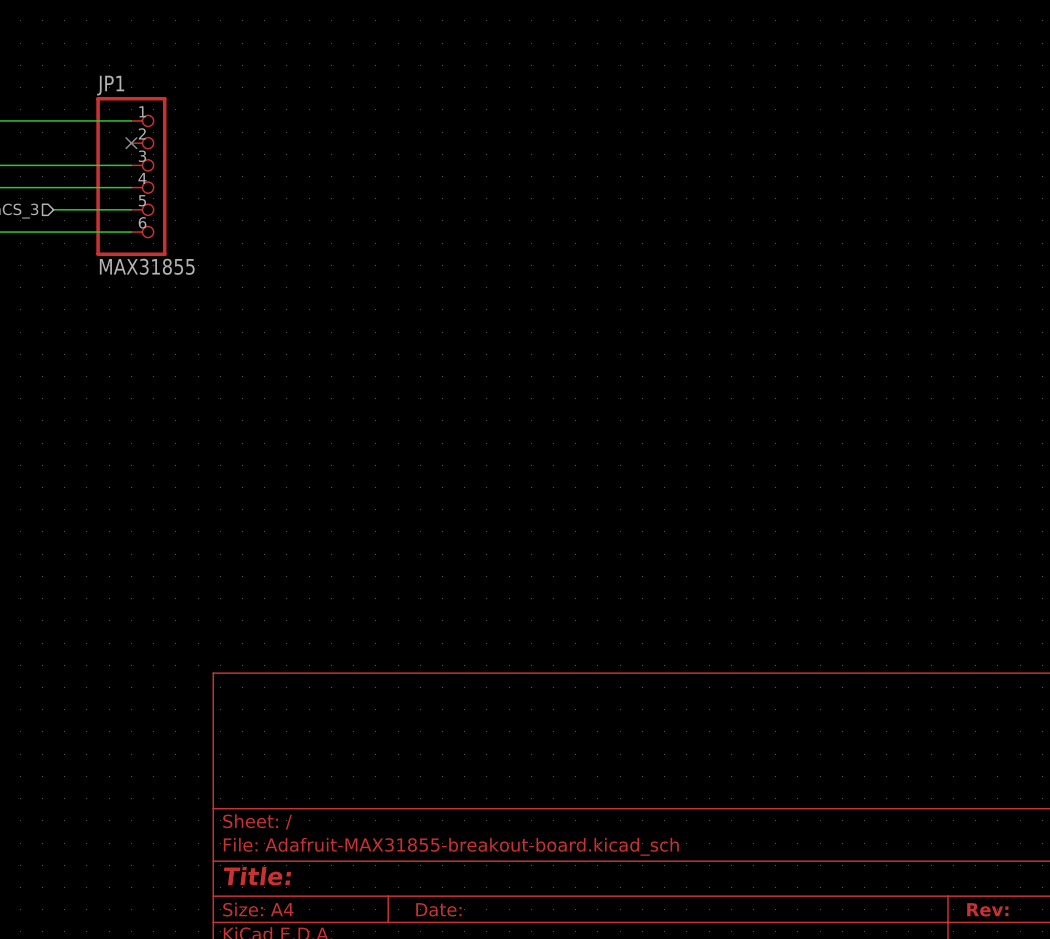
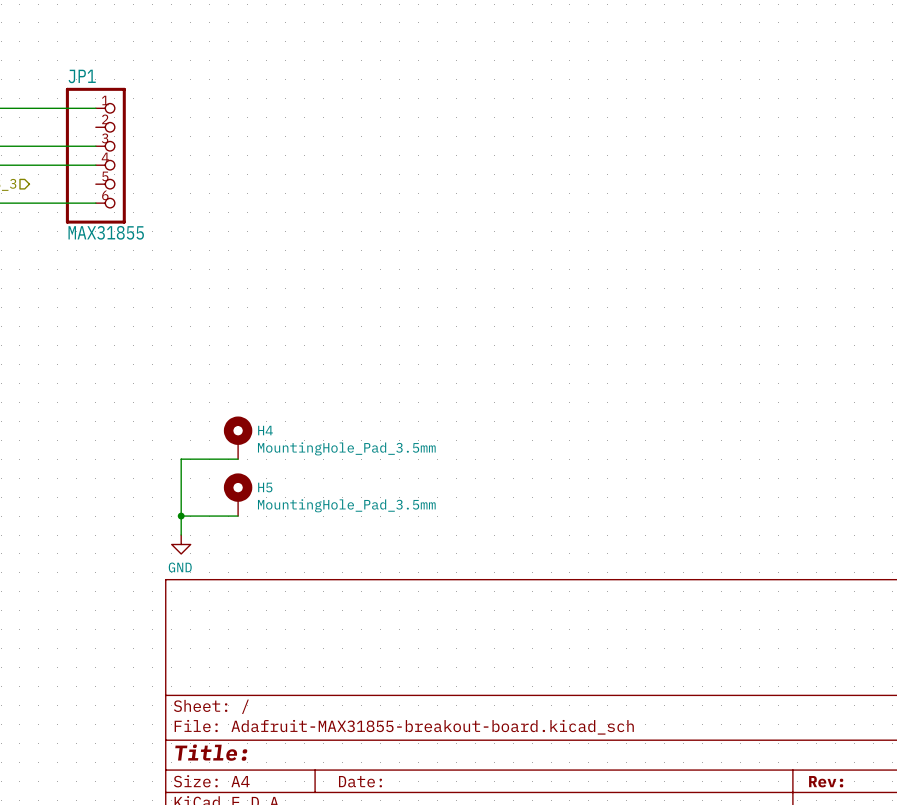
no-connect mark: (131, 143) -> none
wire: (53, 209) (131, 209) -> none
H4: none -> MountingHole_Pad_3.5mm (238, 437)
wire: none -> (238, 459) (181, 459) (181, 535)
H5: none -> MountingHole_Pad_3.5mm (238, 494)
wire: none -> (181, 516) (238, 516)
junction: none -> (181, 516)
power symbol: none -> GND (181, 544)

